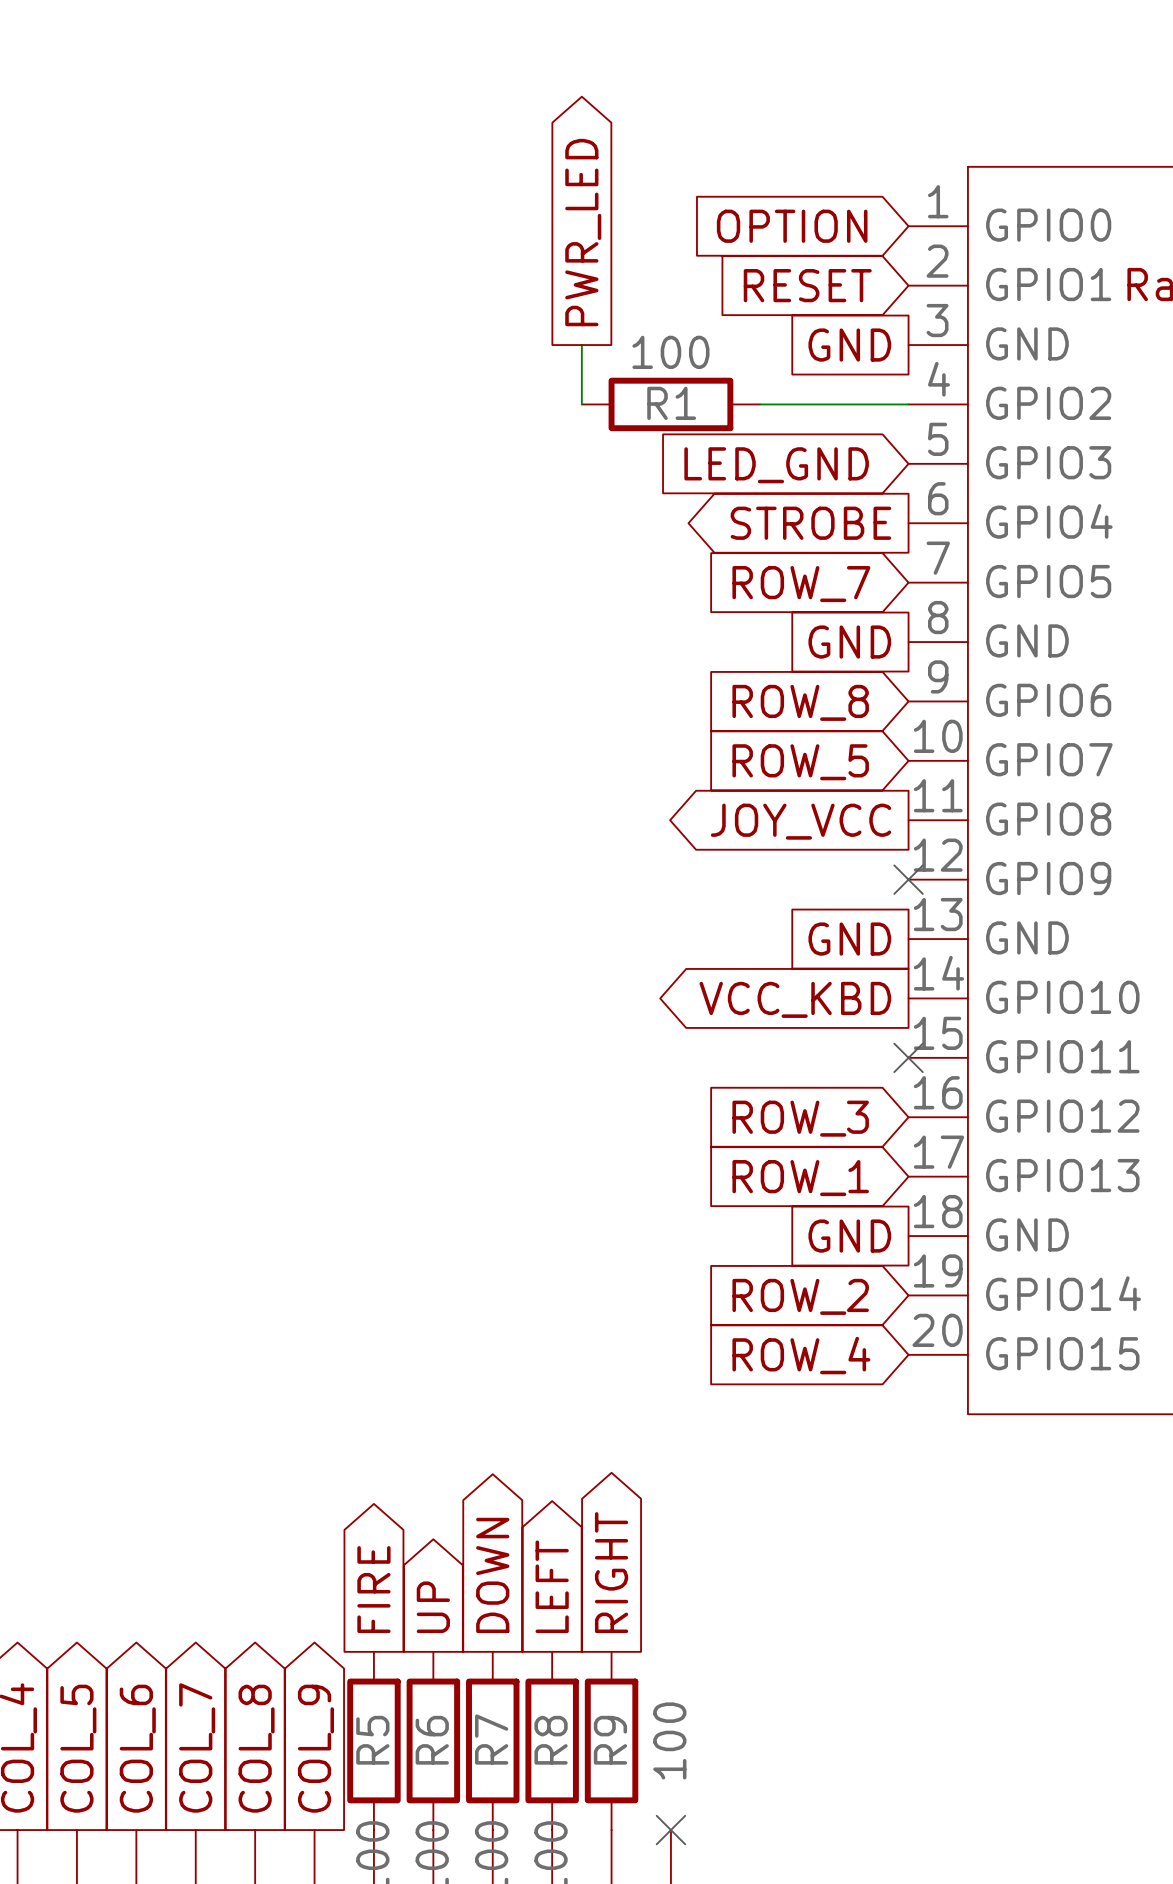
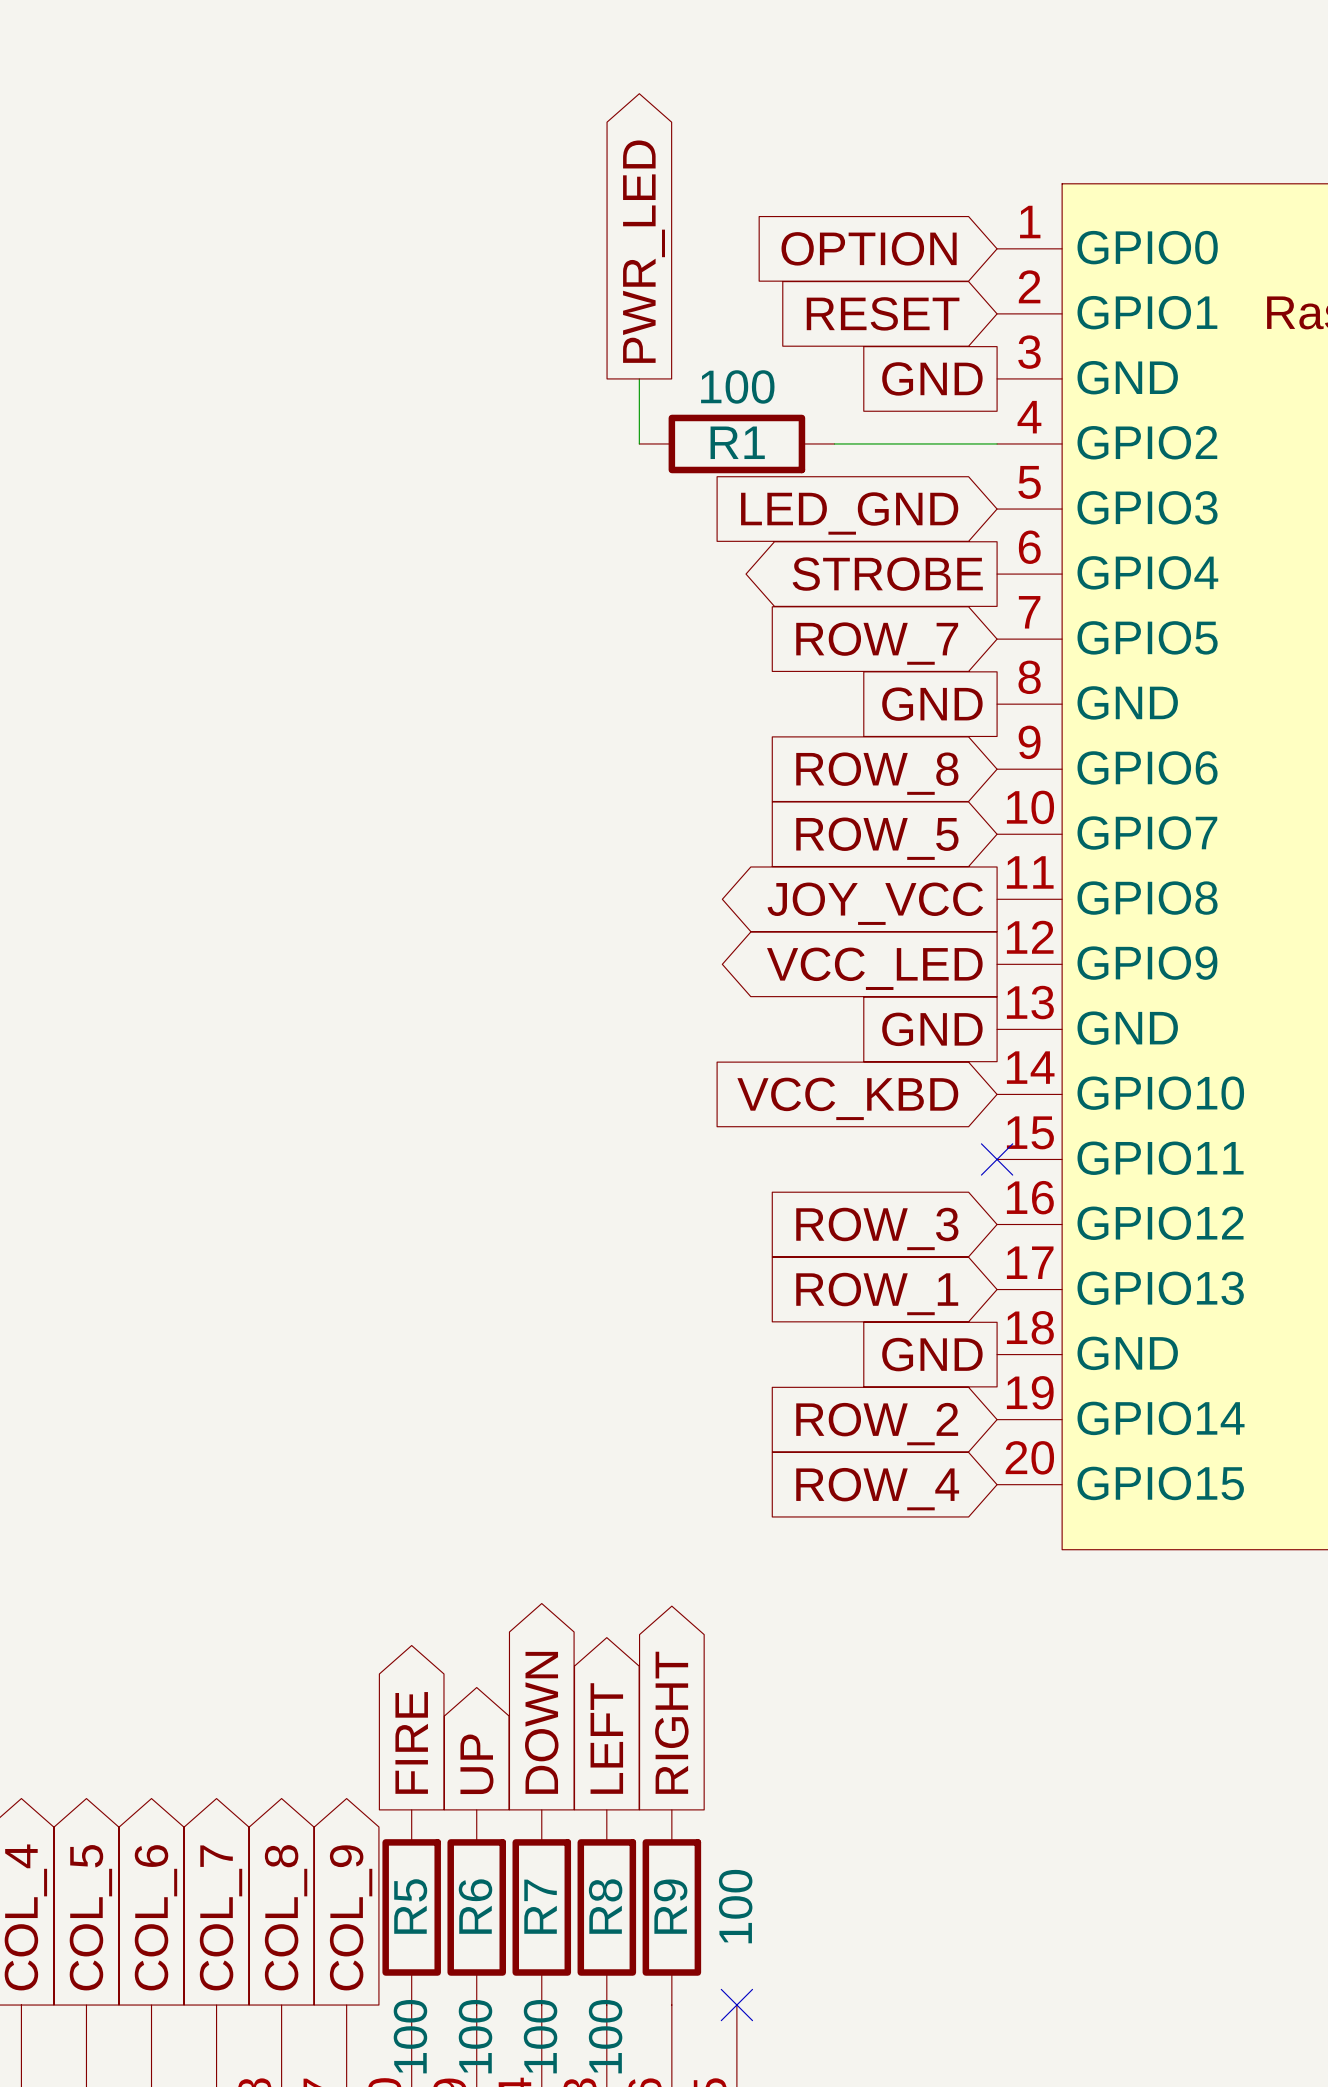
no-connect mark: (908, 879) -> none
global label: none -> VCC_LED (874, 968)
global label shape: output (795, 999) -> input (847, 1098)

